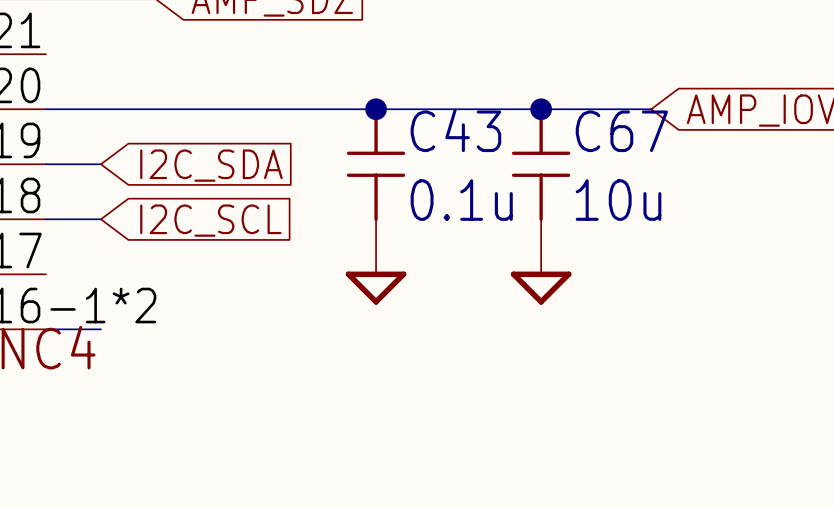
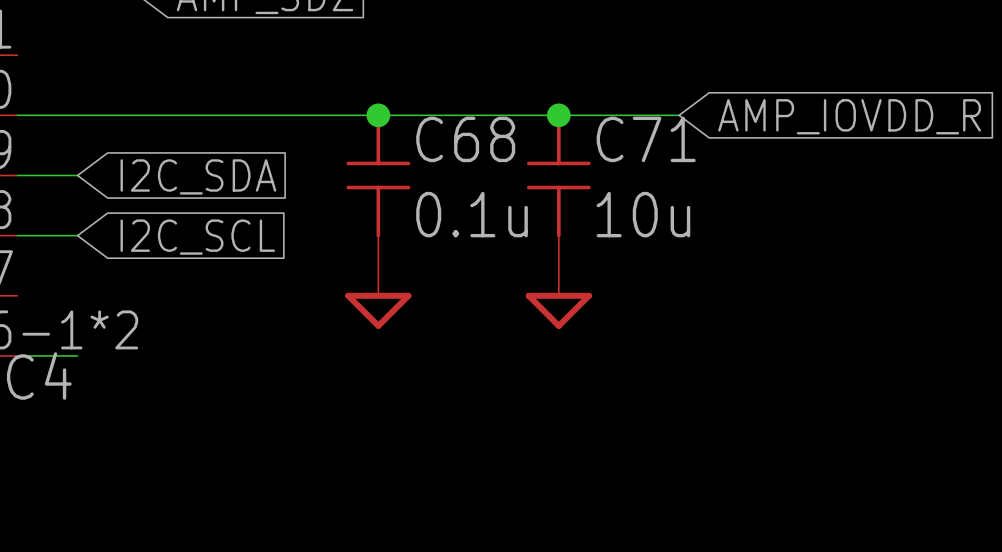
C43 name: C43 (455, 130) -> C68 (465, 139)
C67 name: C67 (621, 131) -> C71 (646, 139)

